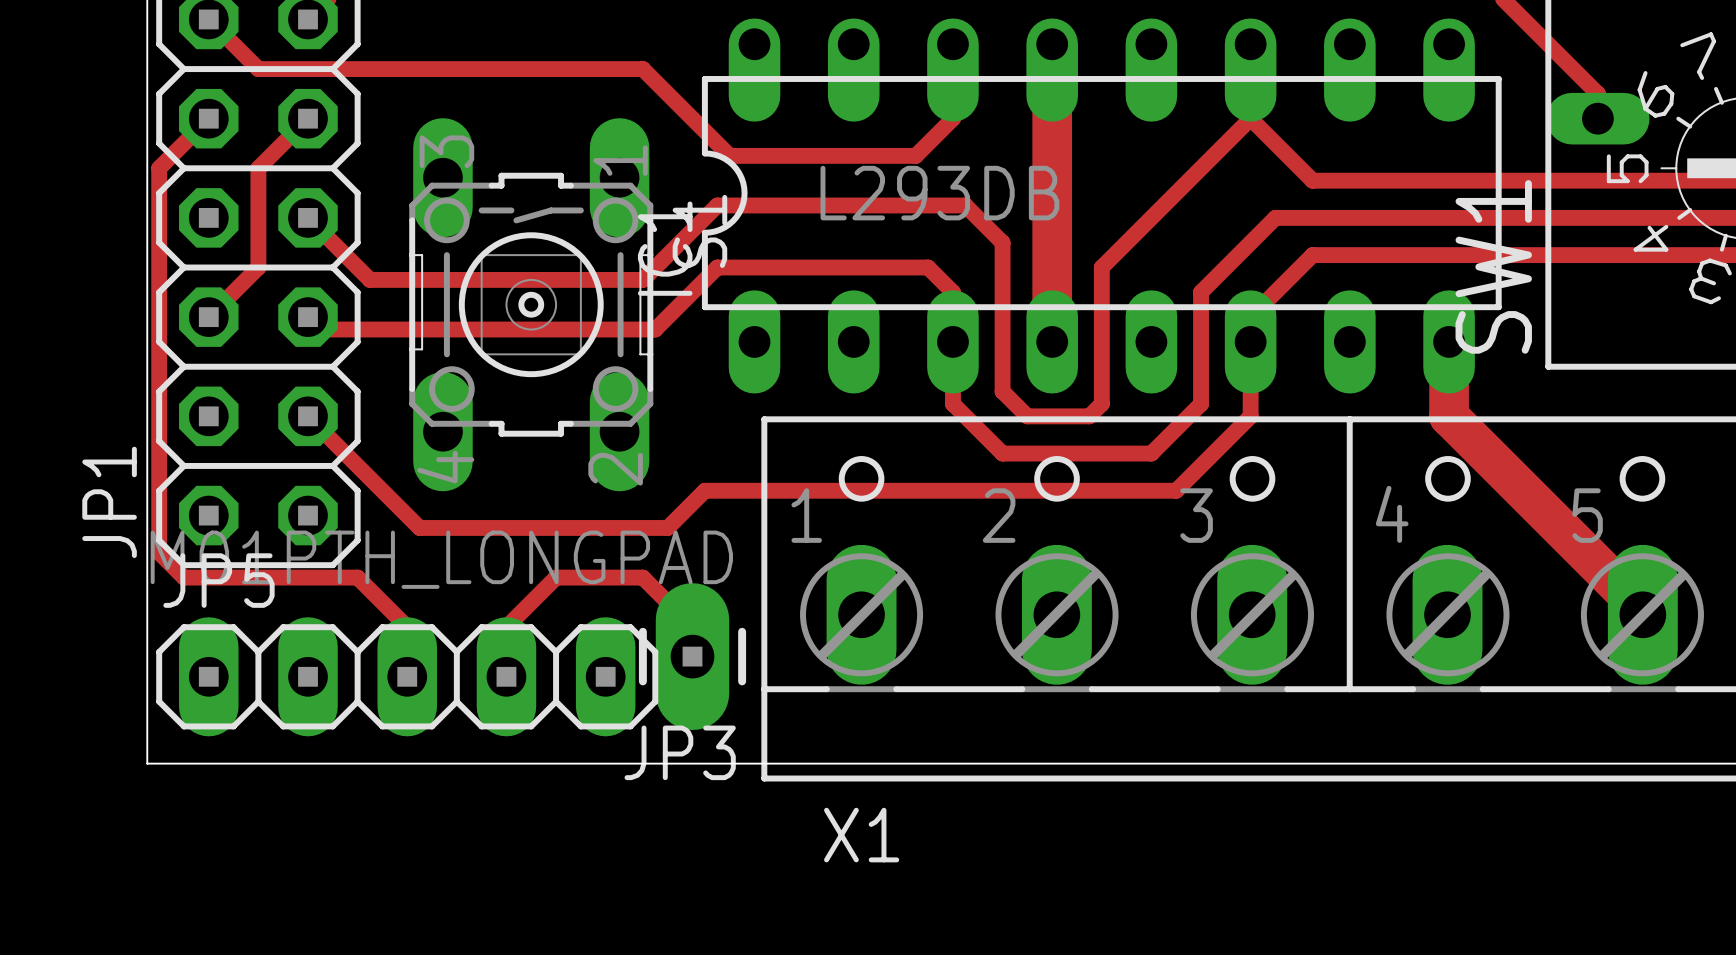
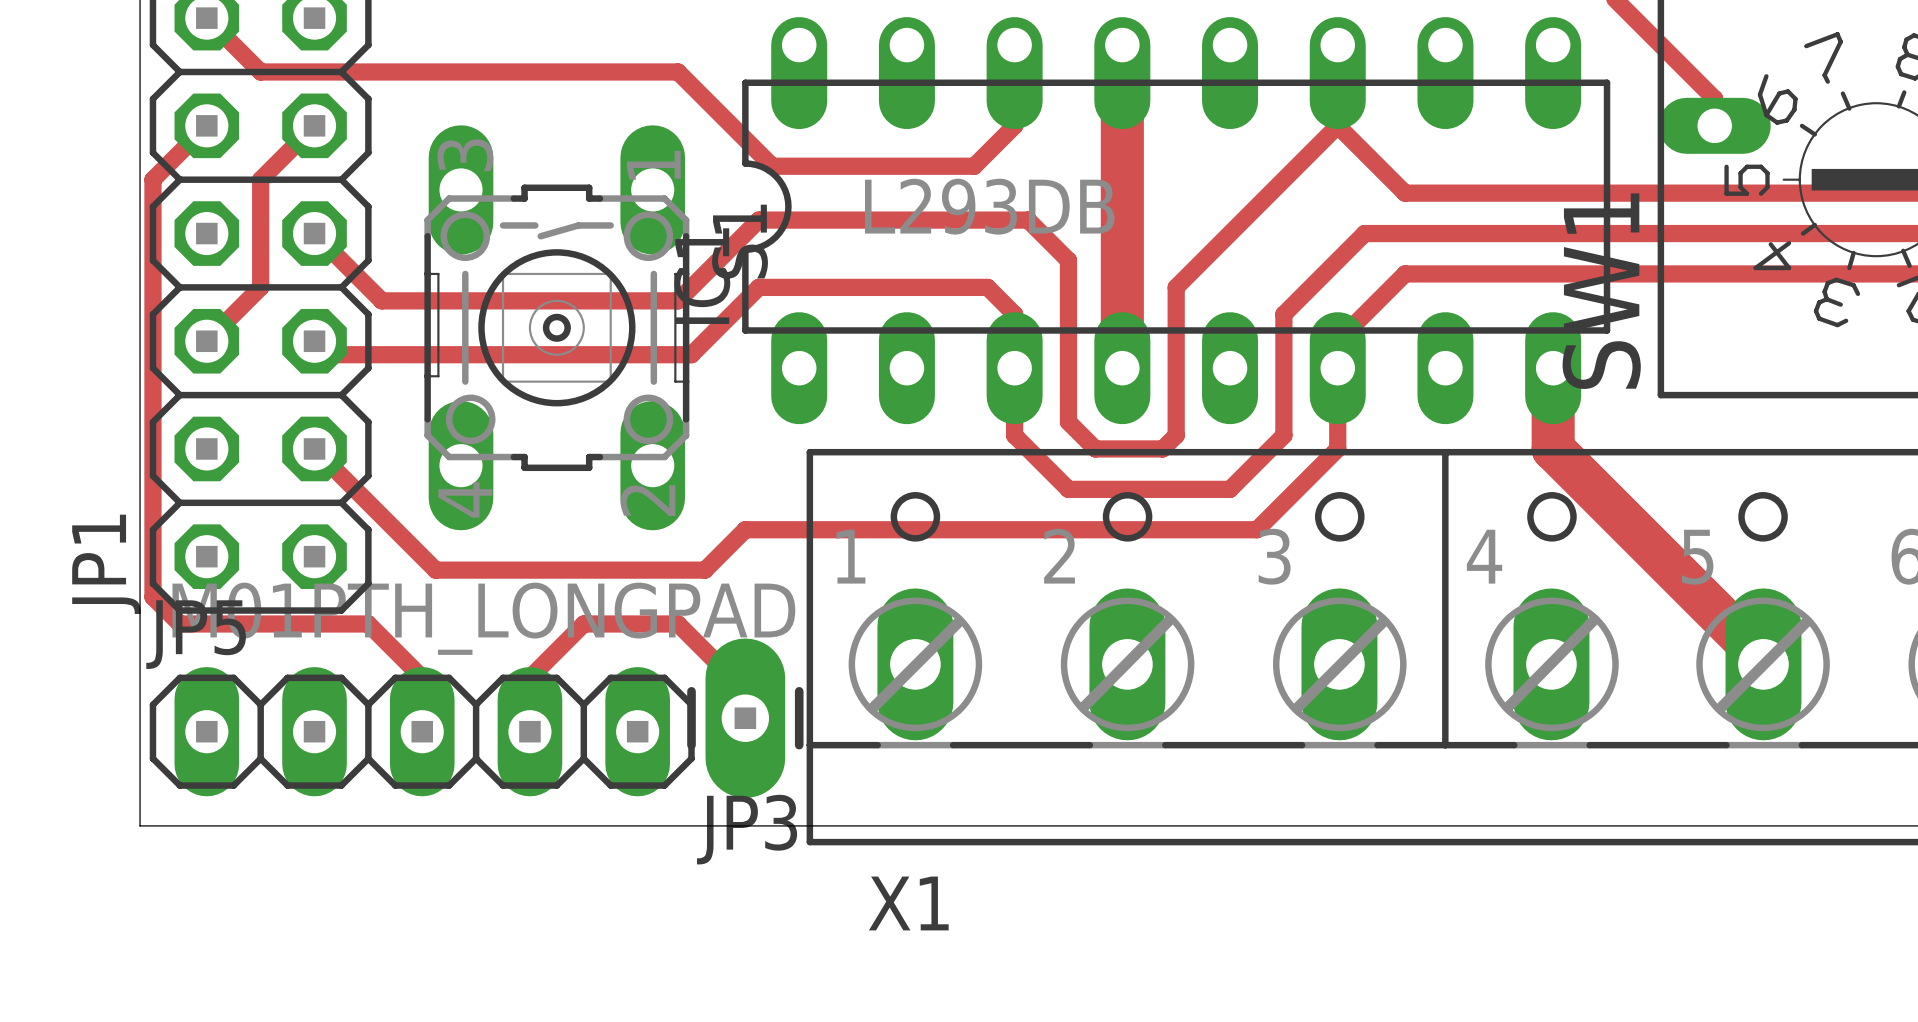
JP3 position: (692, 656) -> (745, 718)

